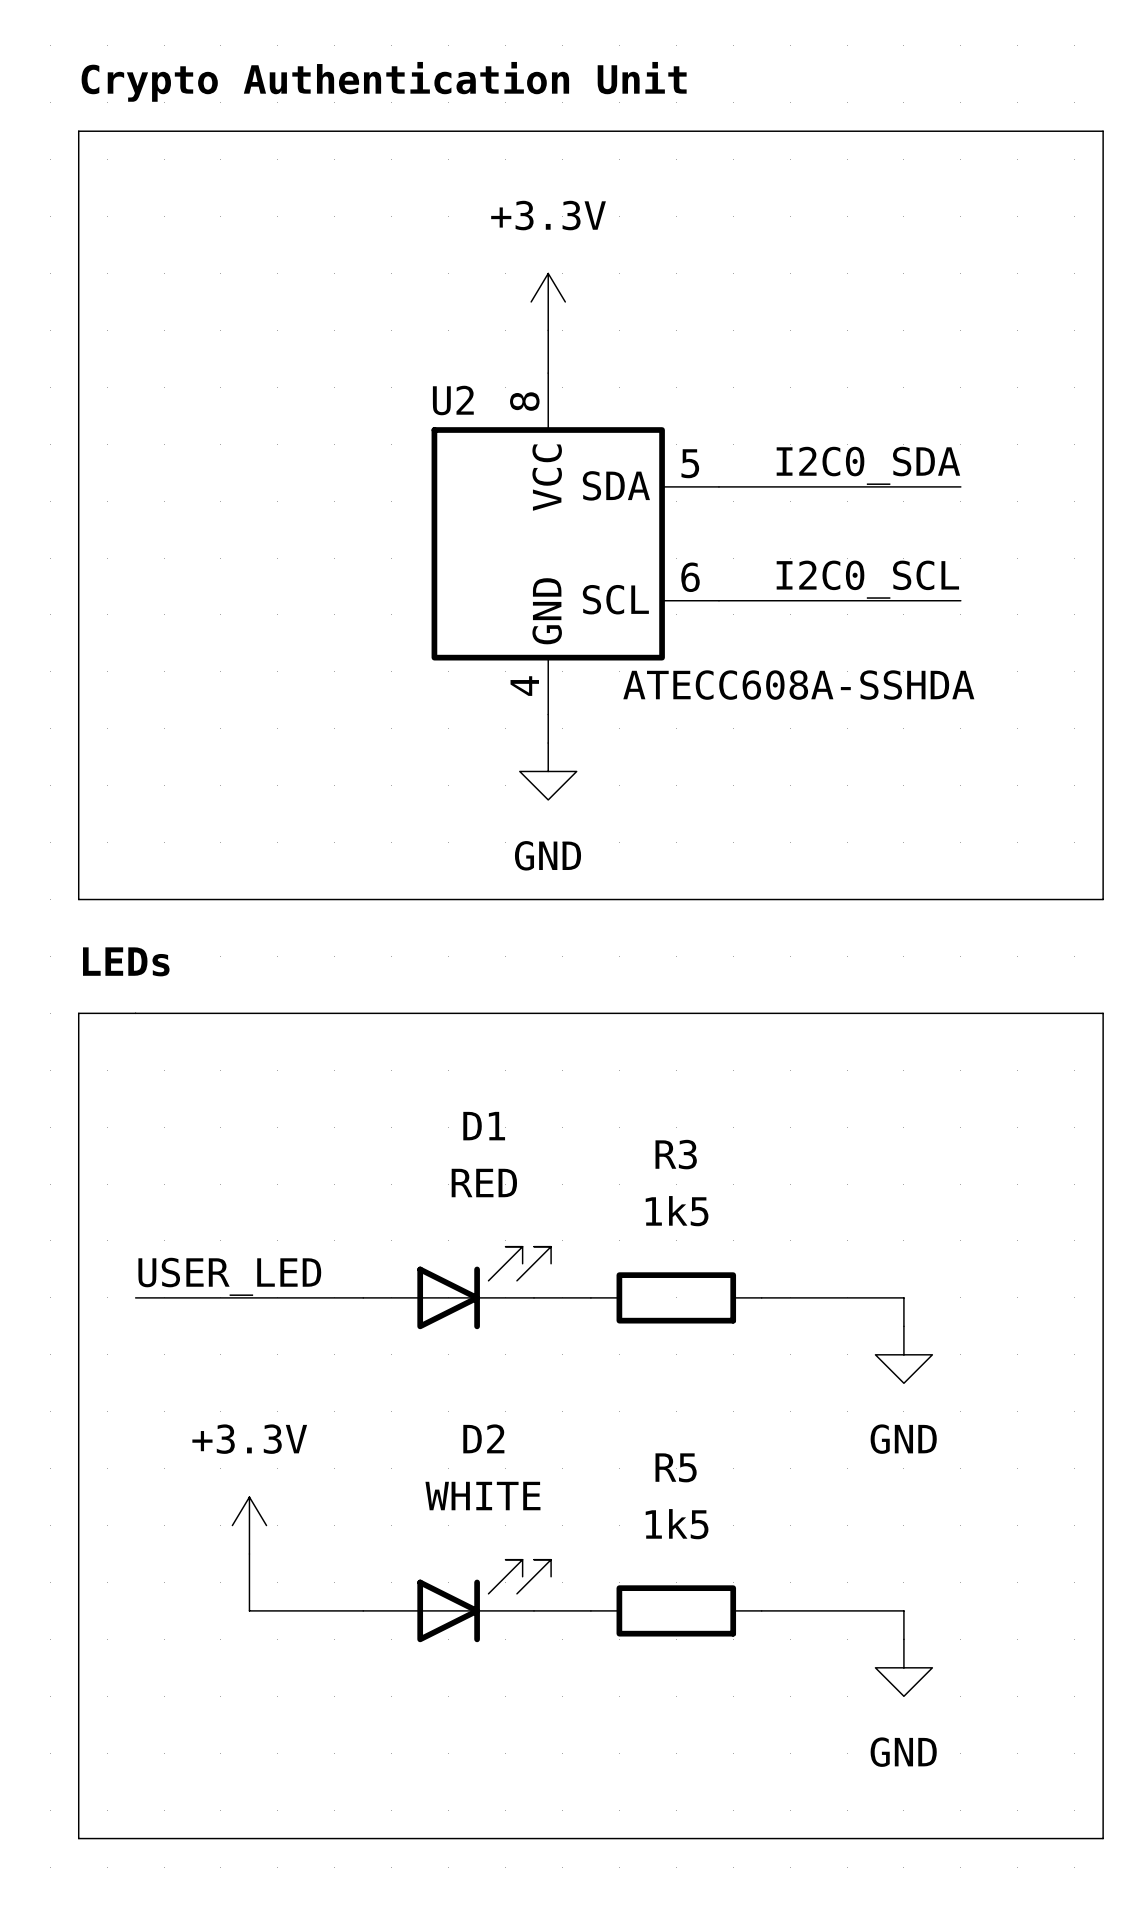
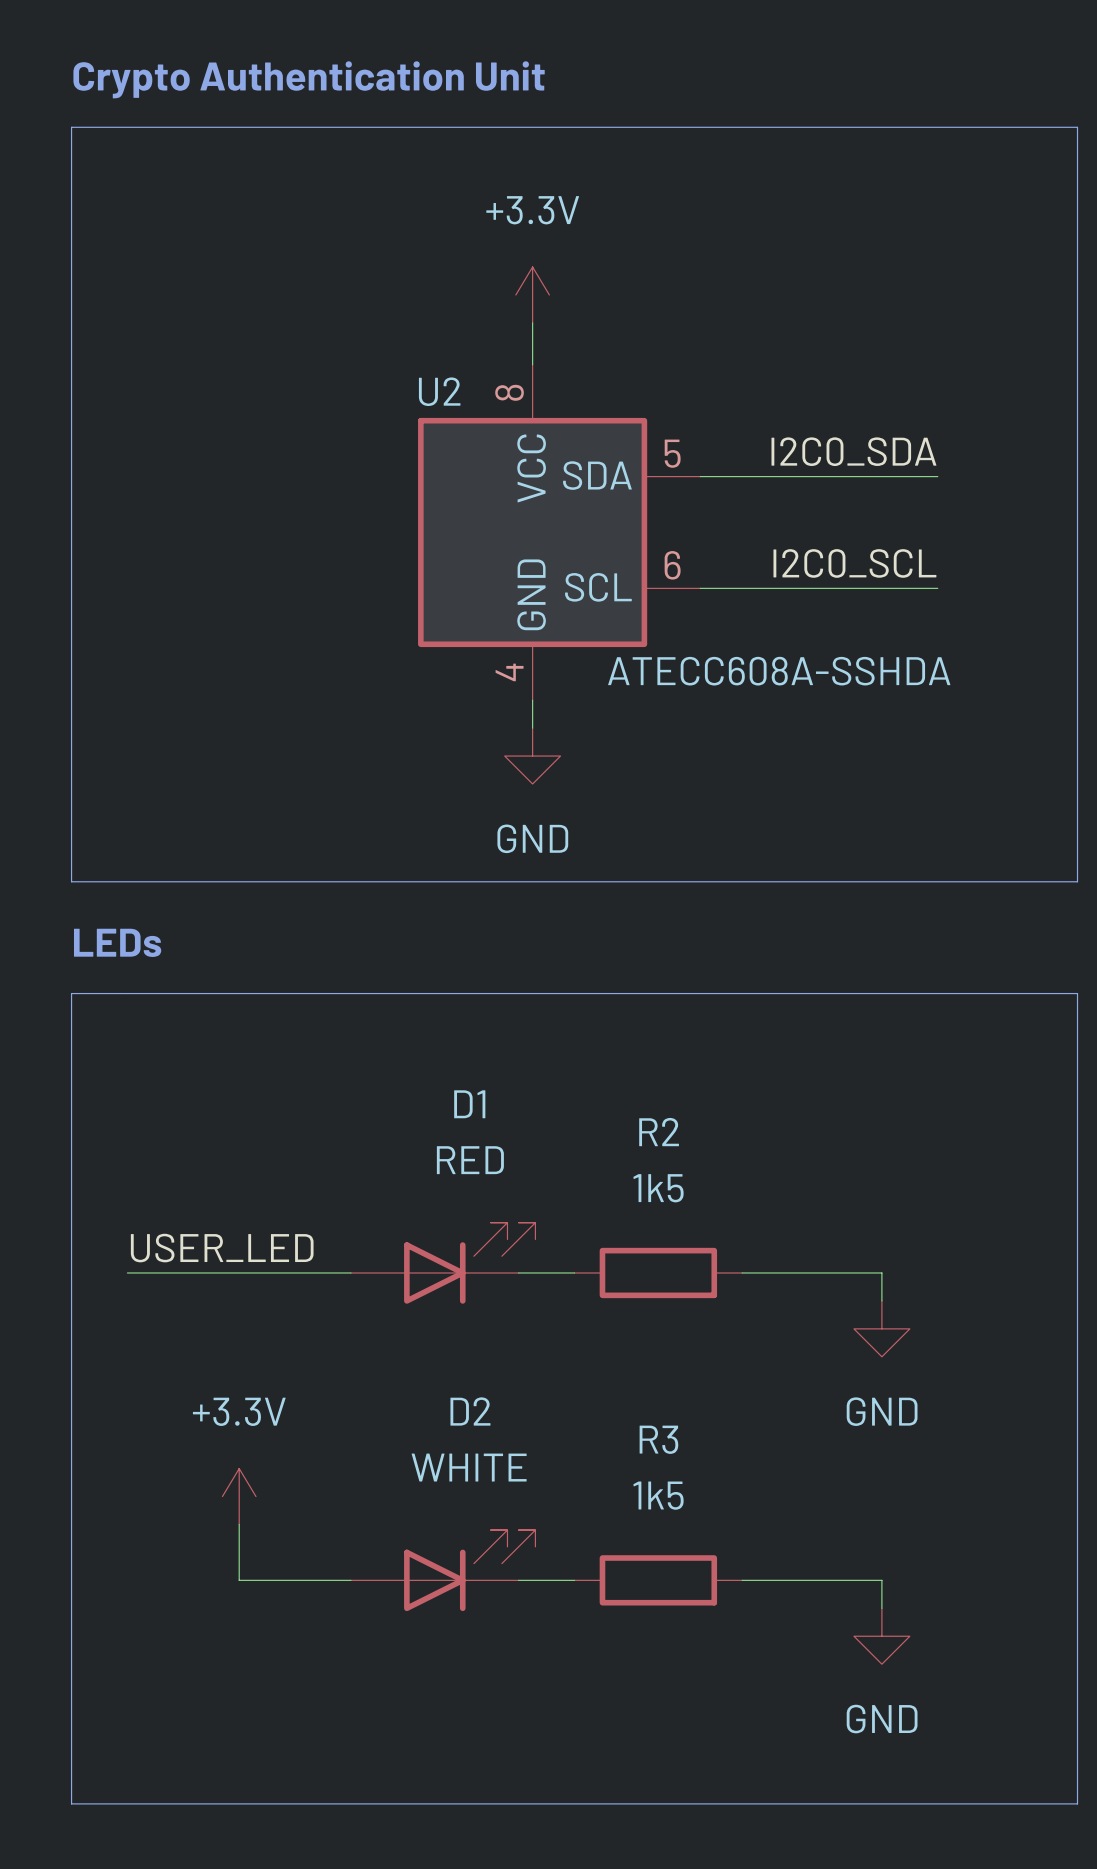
R3 name: R3 (676, 1154) -> R2 (659, 1132)
R5 name: R5 (676, 1467) -> R3 (658, 1439)

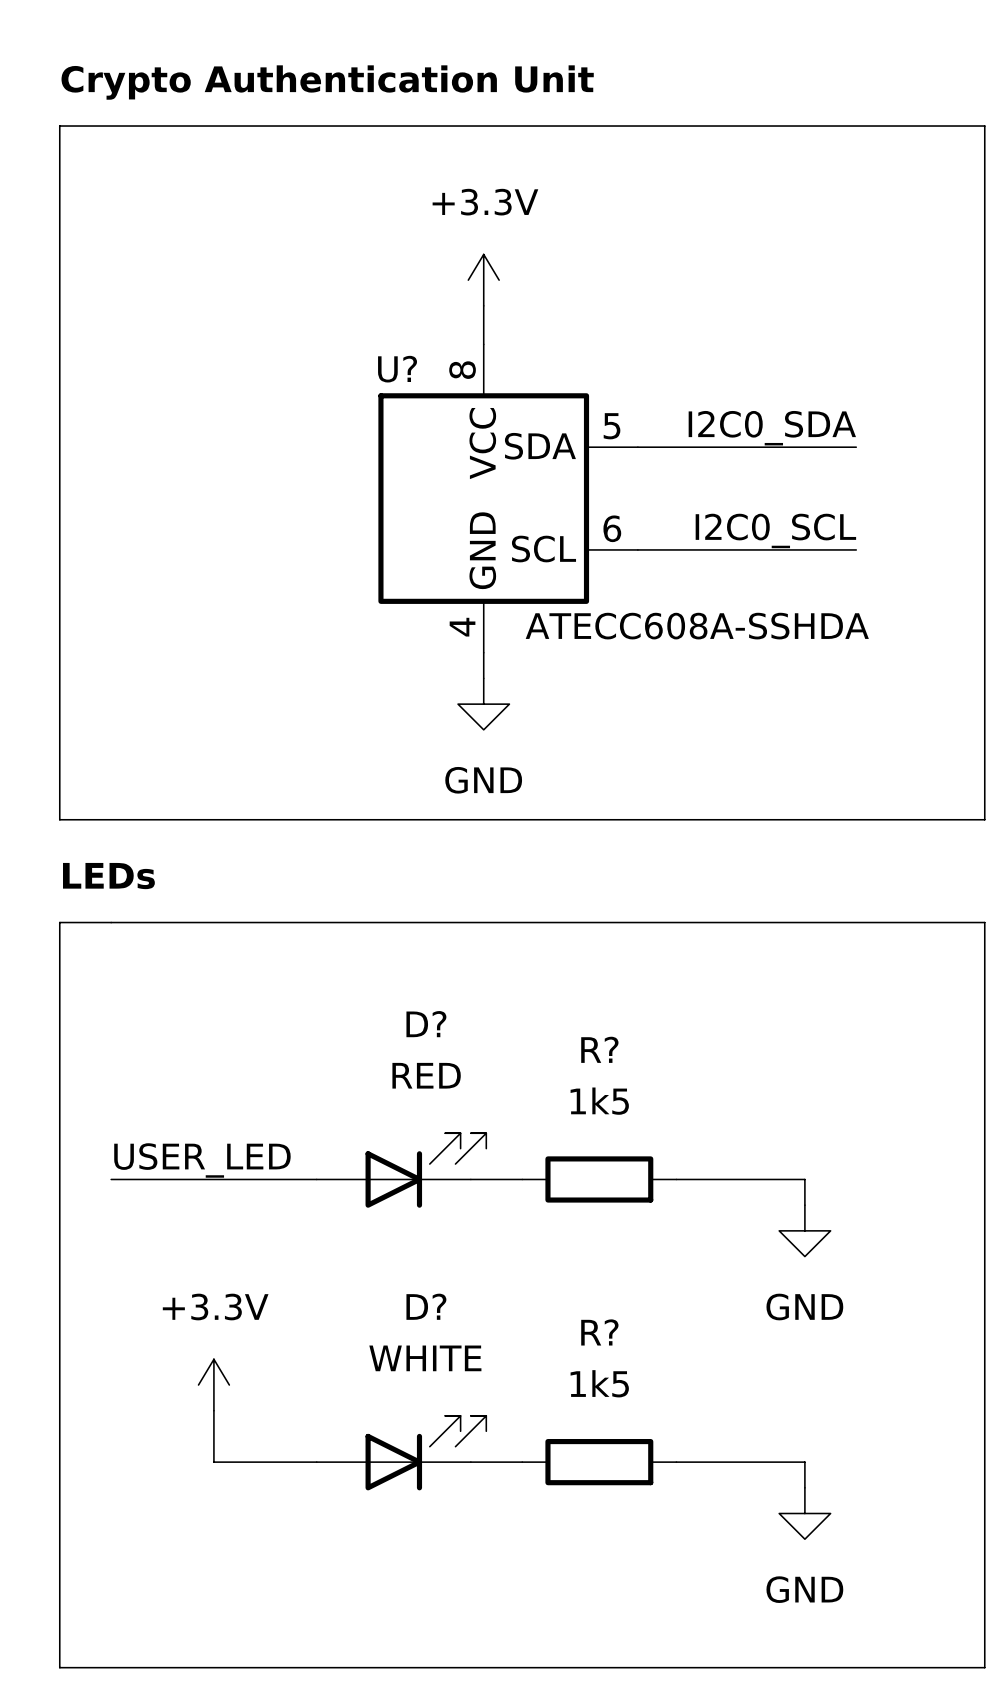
U2 name: U2 (439, 391) -> U? (397, 369)
D1 name: D1 (469, 1104) -> D? (426, 1024)
R2 name: R2 (659, 1132) -> R? (599, 1049)
D2 name: D2 (470, 1411) -> D? (426, 1306)
R3 name: R3 (658, 1439) -> R? (599, 1332)

